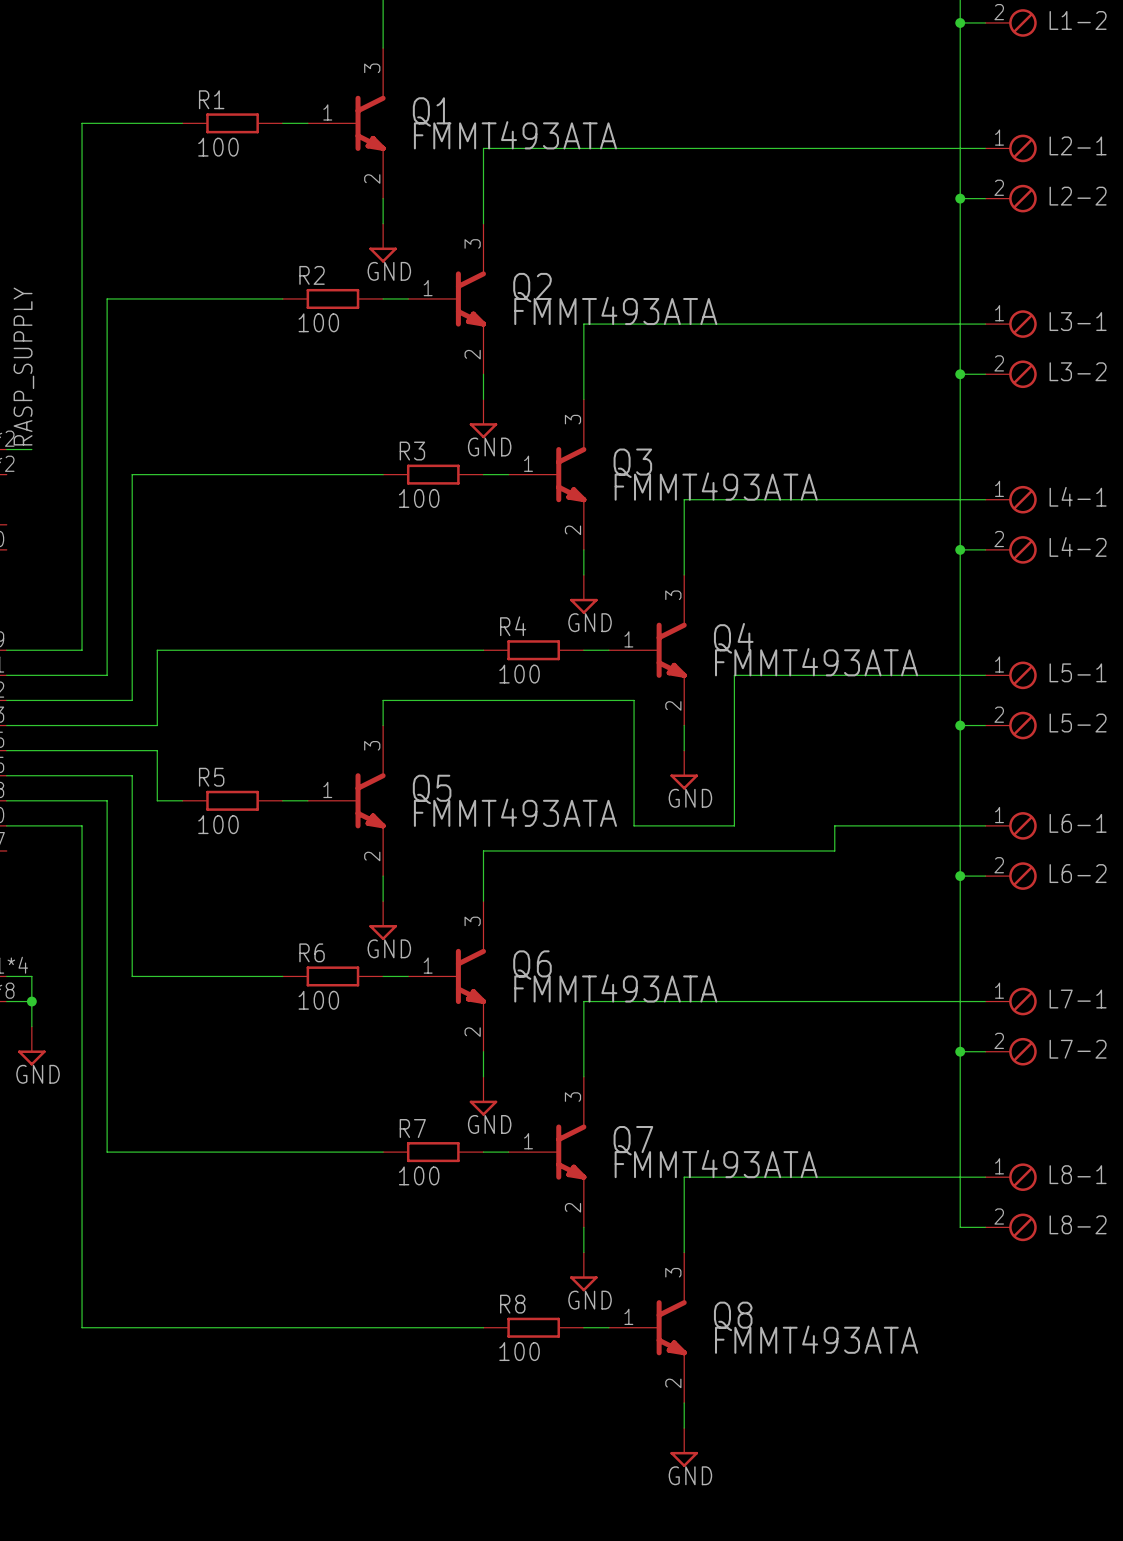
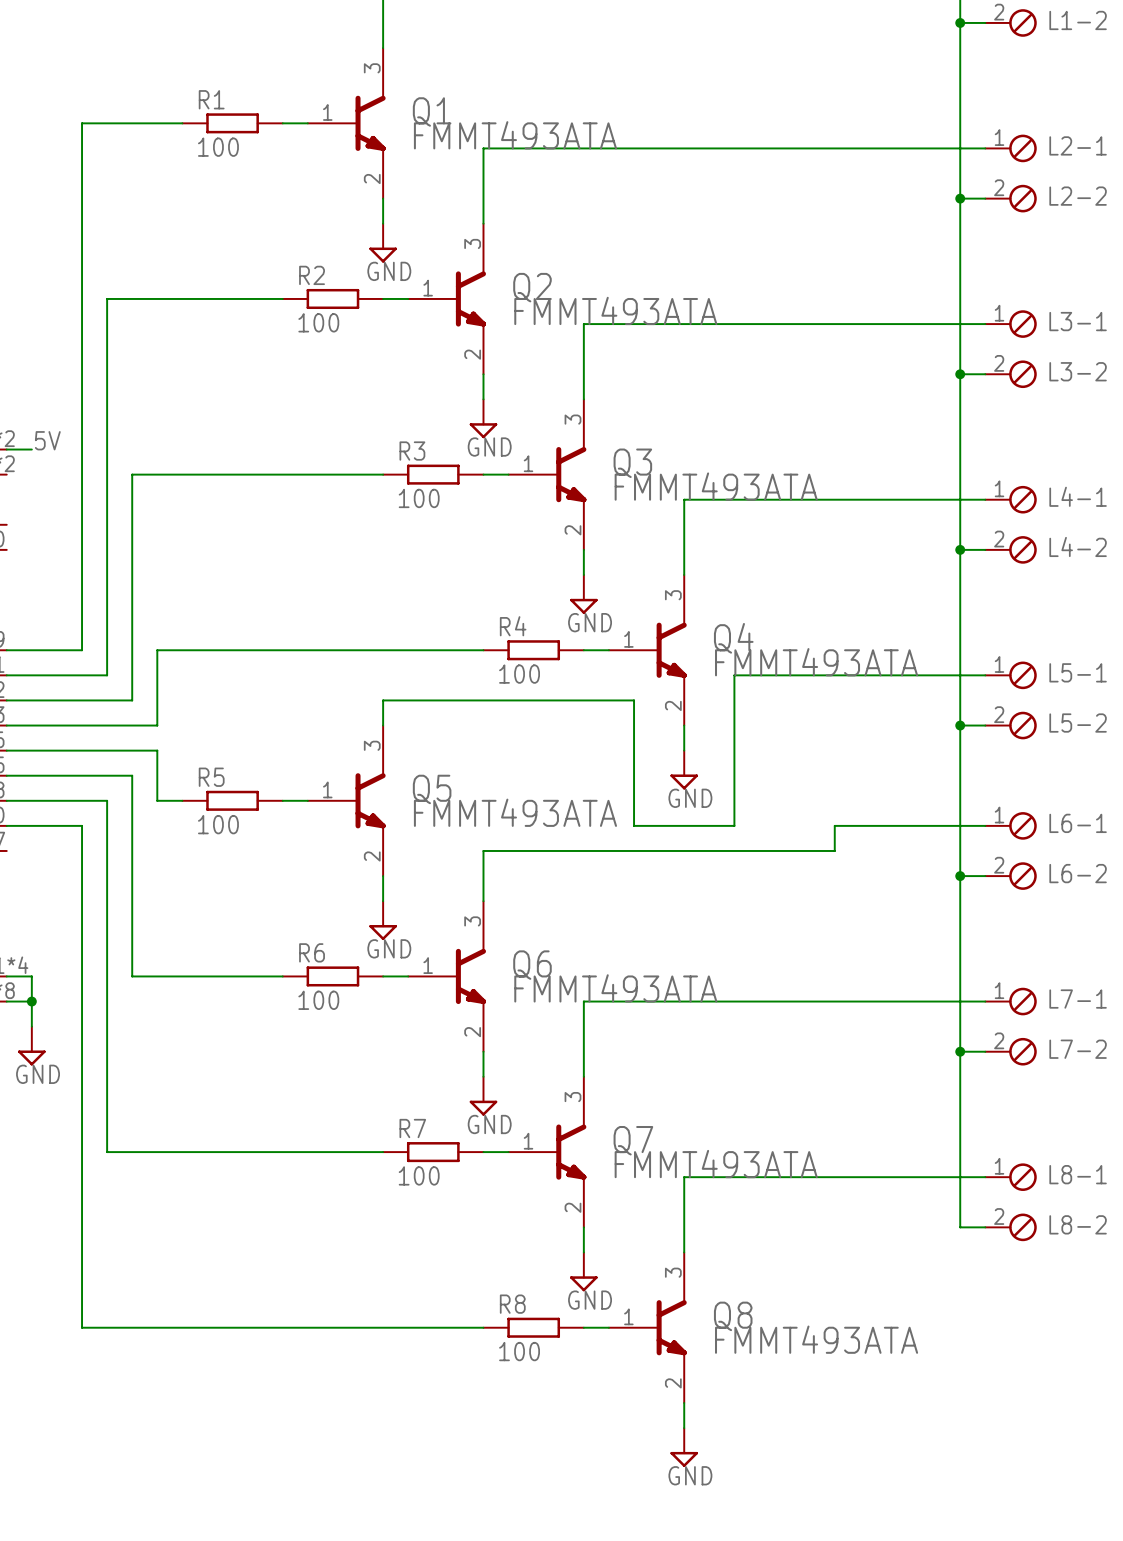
label: RASP_SUPPLY (23, 366) -> 5V (47, 440)

